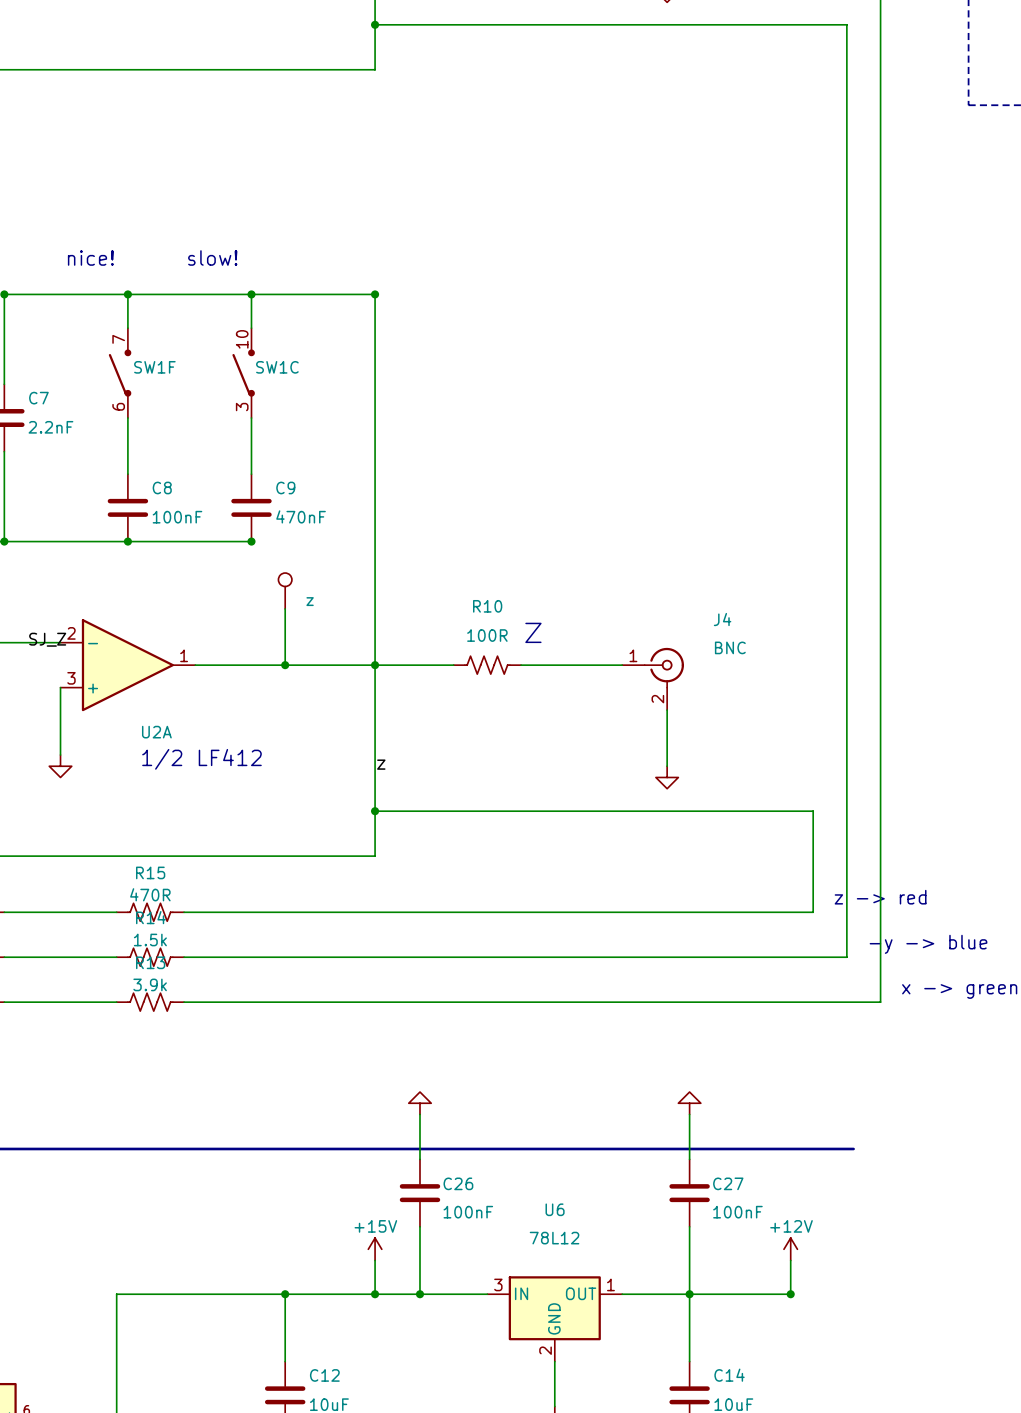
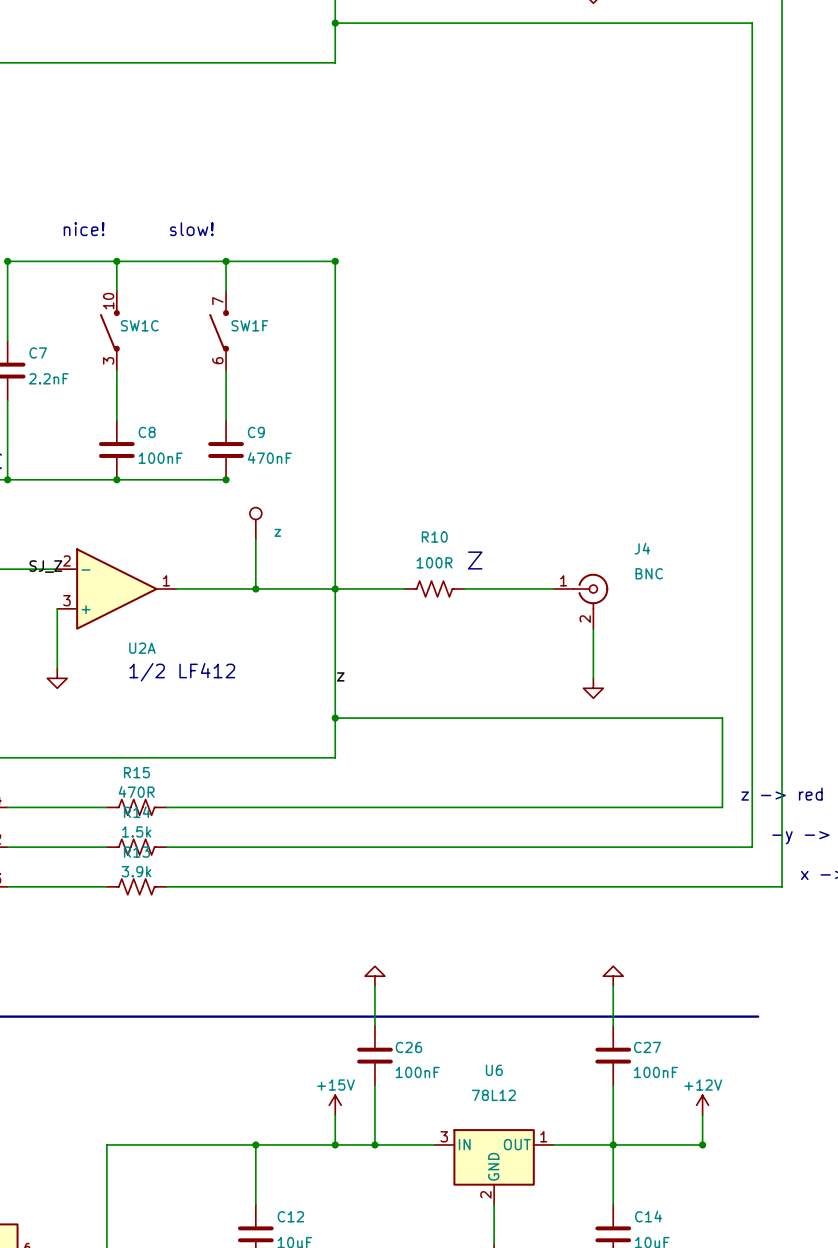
SW1F position: (120, 373) -> (219, 330)
SW1C position: (243, 373) -> (109, 330)

